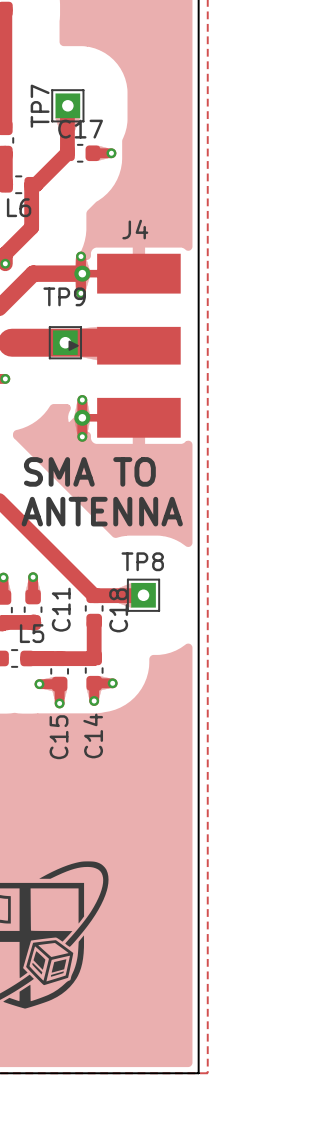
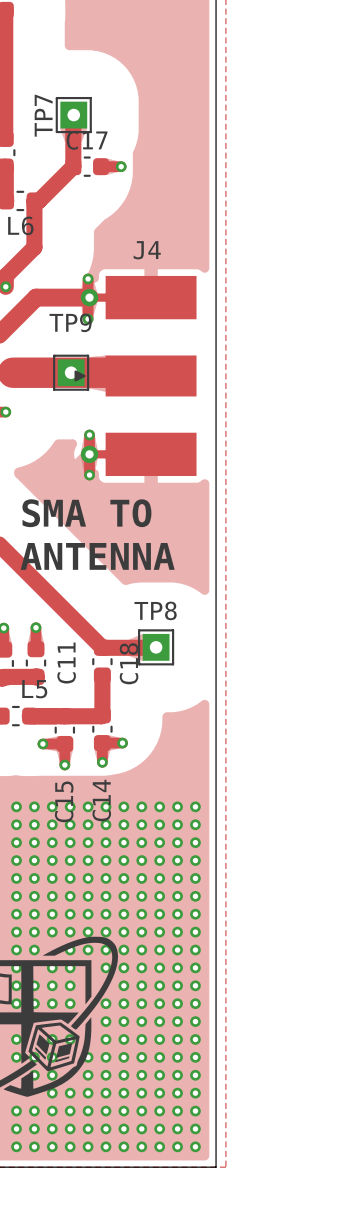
via: none -> (16, 806)
via: none -> (34, 806)
via: none -> (52, 806)
via: none -> (70, 806)
via: none -> (88, 806)
via: none -> (105, 806)
via: none -> (123, 806)
via: none -> (141, 806)
via: none -> (159, 806)
via: none -> (177, 806)
via: none -> (195, 806)
via: none -> (16, 824)
via: none -> (34, 824)
via: none -> (52, 824)
via: none -> (70, 824)
via: none -> (88, 824)
via: none -> (105, 824)
via: none -> (123, 824)
via: none -> (141, 824)
via: none -> (159, 824)
via: none -> (177, 824)
via: none -> (195, 824)
via: none -> (16, 842)
via: none -> (34, 842)
via: none -> (52, 842)
via: none -> (70, 842)
via: none -> (88, 842)
via: none -> (105, 842)
via: none -> (123, 842)
via: none -> (141, 842)
via: none -> (159, 842)
via: none -> (177, 842)
via: none -> (195, 842)
via: none -> (16, 860)
via: none -> (34, 860)
via: none -> (52, 860)
via: none -> (70, 860)
via: none -> (88, 860)
via: none -> (105, 860)
via: none -> (123, 860)
via: none -> (141, 860)
via: none -> (159, 860)
via: none -> (177, 860)
via: none -> (195, 860)
via: none -> (16, 878)
via: none -> (34, 878)
via: none -> (52, 878)
via: none -> (70, 878)
via: none -> (88, 878)
via: none -> (105, 878)
via: none -> (123, 878)
via: none -> (141, 878)
via: none -> (159, 878)
via: none -> (177, 878)
via: none -> (195, 878)
via: none -> (16, 896)
via: none -> (34, 896)
via: none -> (52, 896)
via: none -> (70, 896)
via: none -> (88, 896)
via: none -> (105, 896)
via: none -> (123, 896)
via: none -> (141, 896)
via: none -> (159, 896)
via: none -> (177, 896)
via: none -> (195, 896)
via: none -> (16, 914)
via: none -> (34, 914)
via: none -> (52, 914)
via: none -> (70, 914)
via: none -> (88, 914)
via: none -> (105, 914)
via: none -> (123, 914)
via: none -> (141, 914)
via: none -> (159, 914)
via: none -> (177, 914)
via: none -> (195, 914)
via: none -> (16, 932)
via: none -> (34, 932)
via: none -> (52, 932)
via: none -> (70, 932)
via: none -> (88, 932)
via: none -> (105, 932)
via: none -> (123, 932)
via: none -> (141, 932)
via: none -> (159, 932)
via: none -> (177, 932)
via: none -> (195, 932)
via: none -> (16, 950)
via: none -> (34, 950)
via: none -> (70, 950)
via: none -> (88, 950)
via: none -> (105, 950)
via: none -> (123, 950)
via: none -> (141, 950)
via: none -> (159, 950)
via: none -> (177, 950)
via: none -> (195, 950)
via: none -> (16, 967)
via: none -> (52, 967)
via: none -> (70, 967)
via: none -> (105, 967)
via: none -> (123, 967)
via: none -> (141, 967)
via: none -> (159, 967)
via: none -> (177, 967)
via: none -> (195, 967)
via: none -> (16, 985)
via: none -> (34, 985)
via: none -> (52, 985)
via: none -> (70, 985)
via: none -> (123, 985)
via: none -> (141, 985)
via: none -> (159, 985)
via: none -> (177, 985)
via: none -> (195, 985)
via: none -> (16, 1003)
via: none -> (34, 1003)
via: none -> (52, 1003)
via: none -> (70, 1003)
via: none -> (105, 1003)
via: none -> (123, 1003)
via: none -> (141, 1003)
via: none -> (159, 1003)
via: none -> (177, 1003)
via: none -> (195, 1003)
via: none -> (105, 1021)
via: none -> (123, 1021)
via: none -> (141, 1021)
via: none -> (159, 1021)
via: none -> (177, 1021)
via: none -> (195, 1021)
via: none -> (16, 1039)
via: none -> (52, 1039)
via: none -> (70, 1039)
via: none -> (105, 1039)
via: none -> (123, 1039)
via: none -> (141, 1039)
via: none -> (159, 1039)
via: none -> (177, 1039)
via: none -> (195, 1039)
via: none -> (16, 1057)
via: none -> (34, 1057)
via: none -> (52, 1057)
via: none -> (88, 1057)
via: none -> (105, 1057)
via: none -> (123, 1057)
via: none -> (141, 1057)
via: none -> (159, 1057)
via: none -> (177, 1057)
via: none -> (195, 1057)
via: none -> (34, 1075)
via: none -> (52, 1075)
via: none -> (88, 1075)
via: none -> (105, 1075)
via: none -> (123, 1075)
via: none -> (141, 1075)
via: none -> (159, 1075)
via: none -> (177, 1075)
via: none -> (195, 1075)
via: none -> (52, 1093)
via: none -> (70, 1093)
via: none -> (88, 1093)
via: none -> (105, 1093)
via: none -> (123, 1093)
via: none -> (141, 1093)
via: none -> (159, 1093)
via: none -> (177, 1093)
via: none -> (195, 1093)
via: none -> (16, 1111)
via: none -> (34, 1111)
via: none -> (52, 1111)
via: none -> (70, 1111)
via: none -> (88, 1111)
via: none -> (105, 1111)
via: none -> (123, 1111)
via: none -> (141, 1111)
via: none -> (159, 1111)
via: none -> (177, 1111)
via: none -> (195, 1111)
via: none -> (16, 1128)
via: none -> (34, 1128)
via: none -> (52, 1128)
via: none -> (70, 1128)
via: none -> (88, 1128)
via: none -> (105, 1128)
via: none -> (123, 1128)
via: none -> (141, 1128)
via: none -> (159, 1128)
via: none -> (177, 1128)
via: none -> (195, 1128)
via: none -> (16, 1146)
via: none -> (34, 1146)
via: none -> (52, 1146)
via: none -> (70, 1146)
via: none -> (88, 1146)
via: none -> (105, 1146)
via: none -> (123, 1146)
via: none -> (141, 1146)
via: none -> (159, 1146)
via: none -> (177, 1146)
via: none -> (195, 1146)

